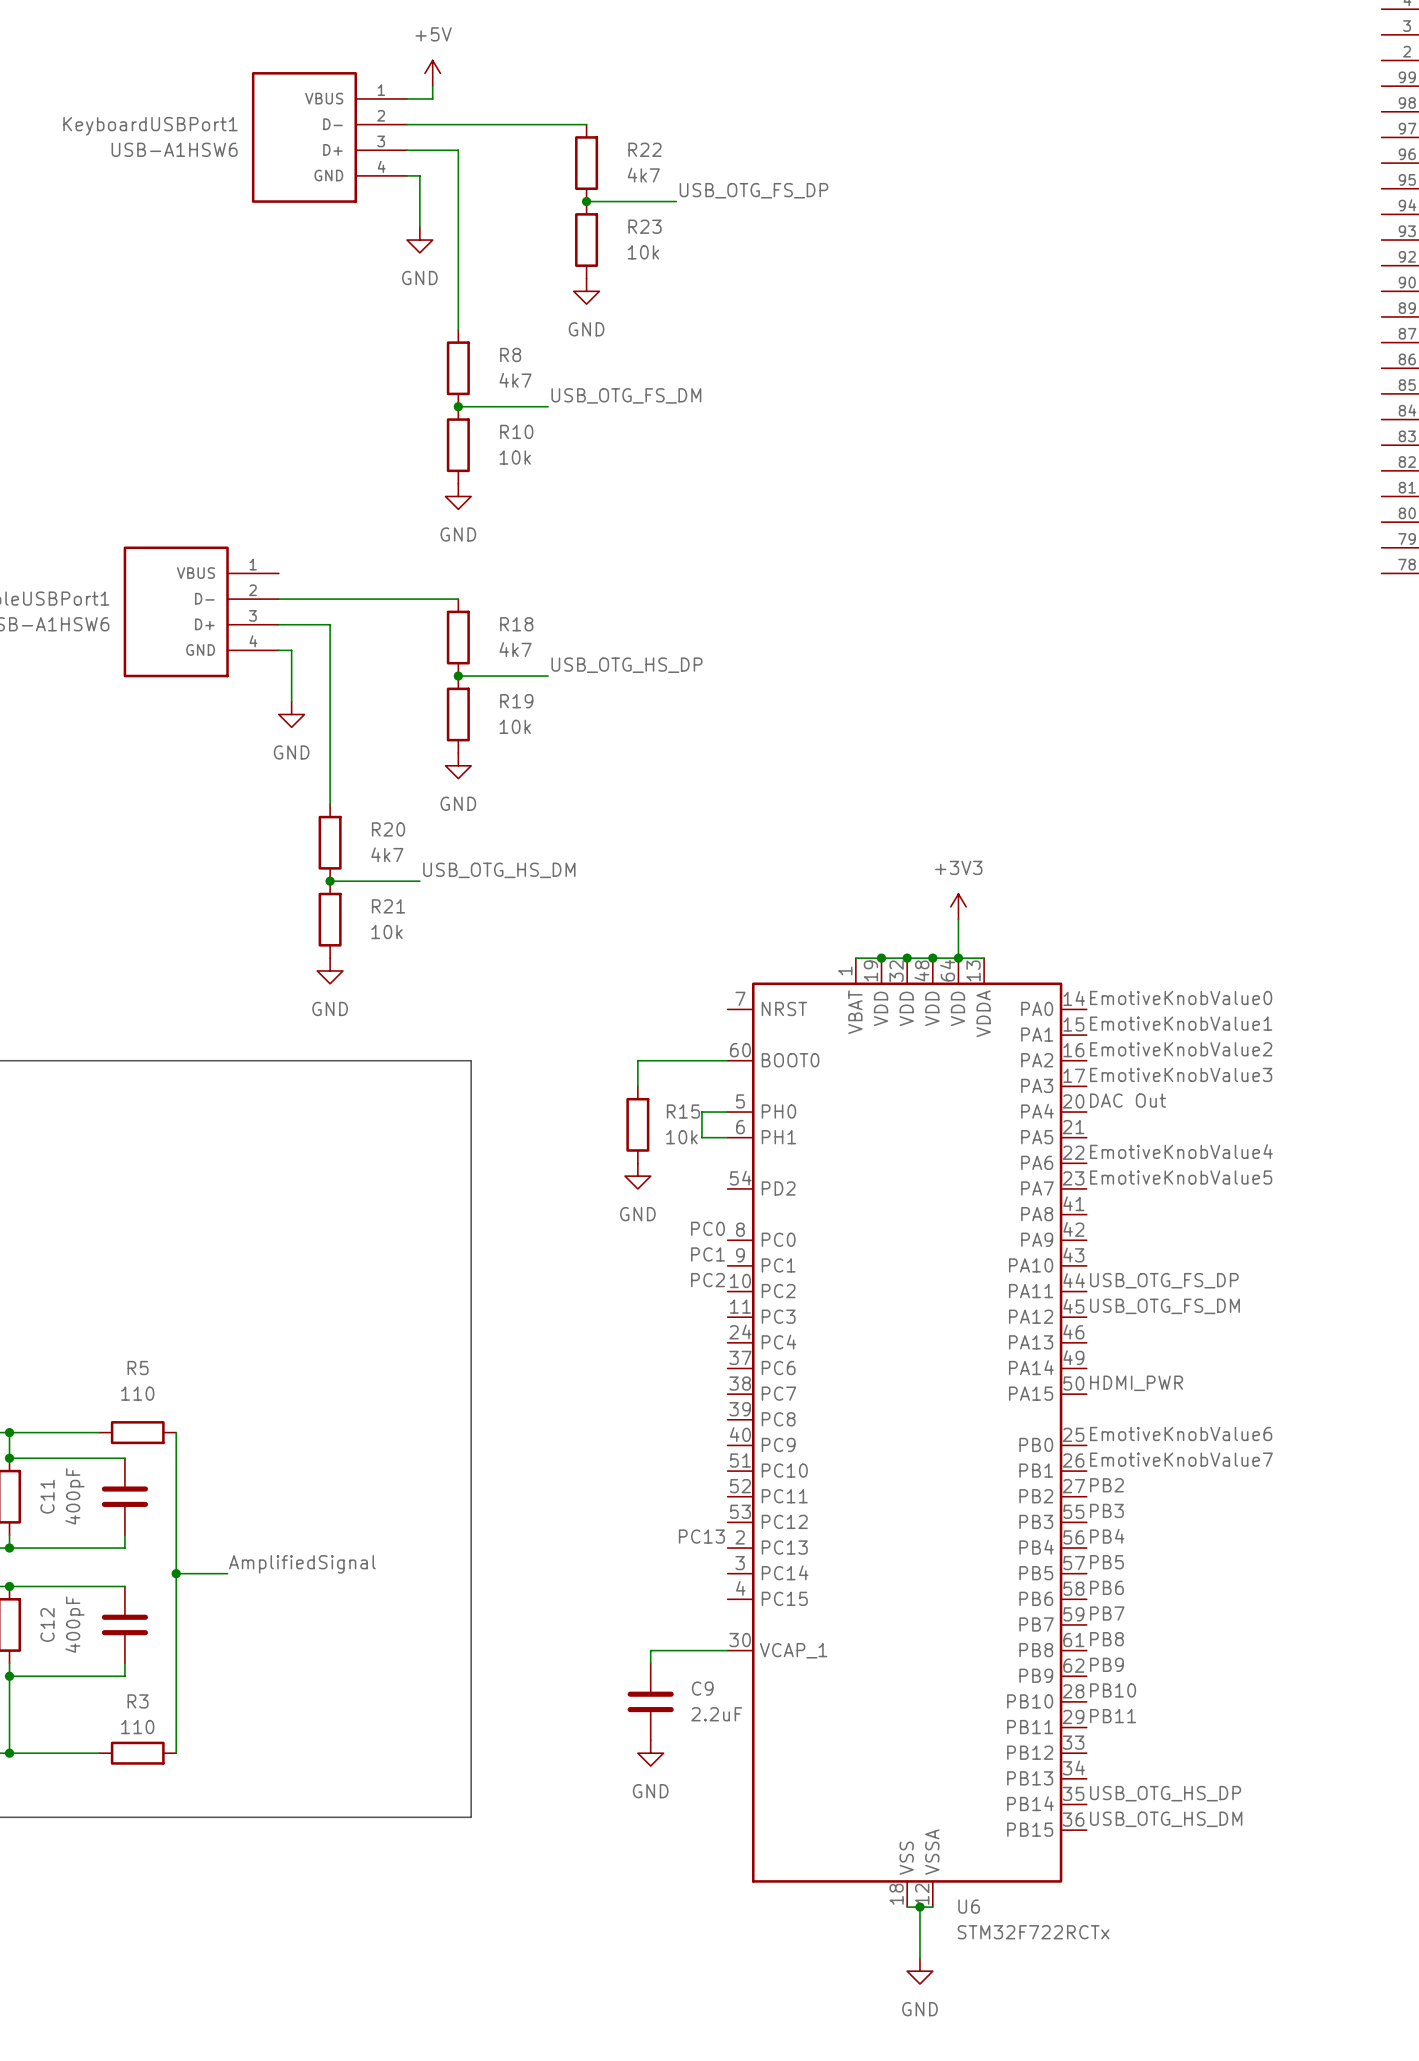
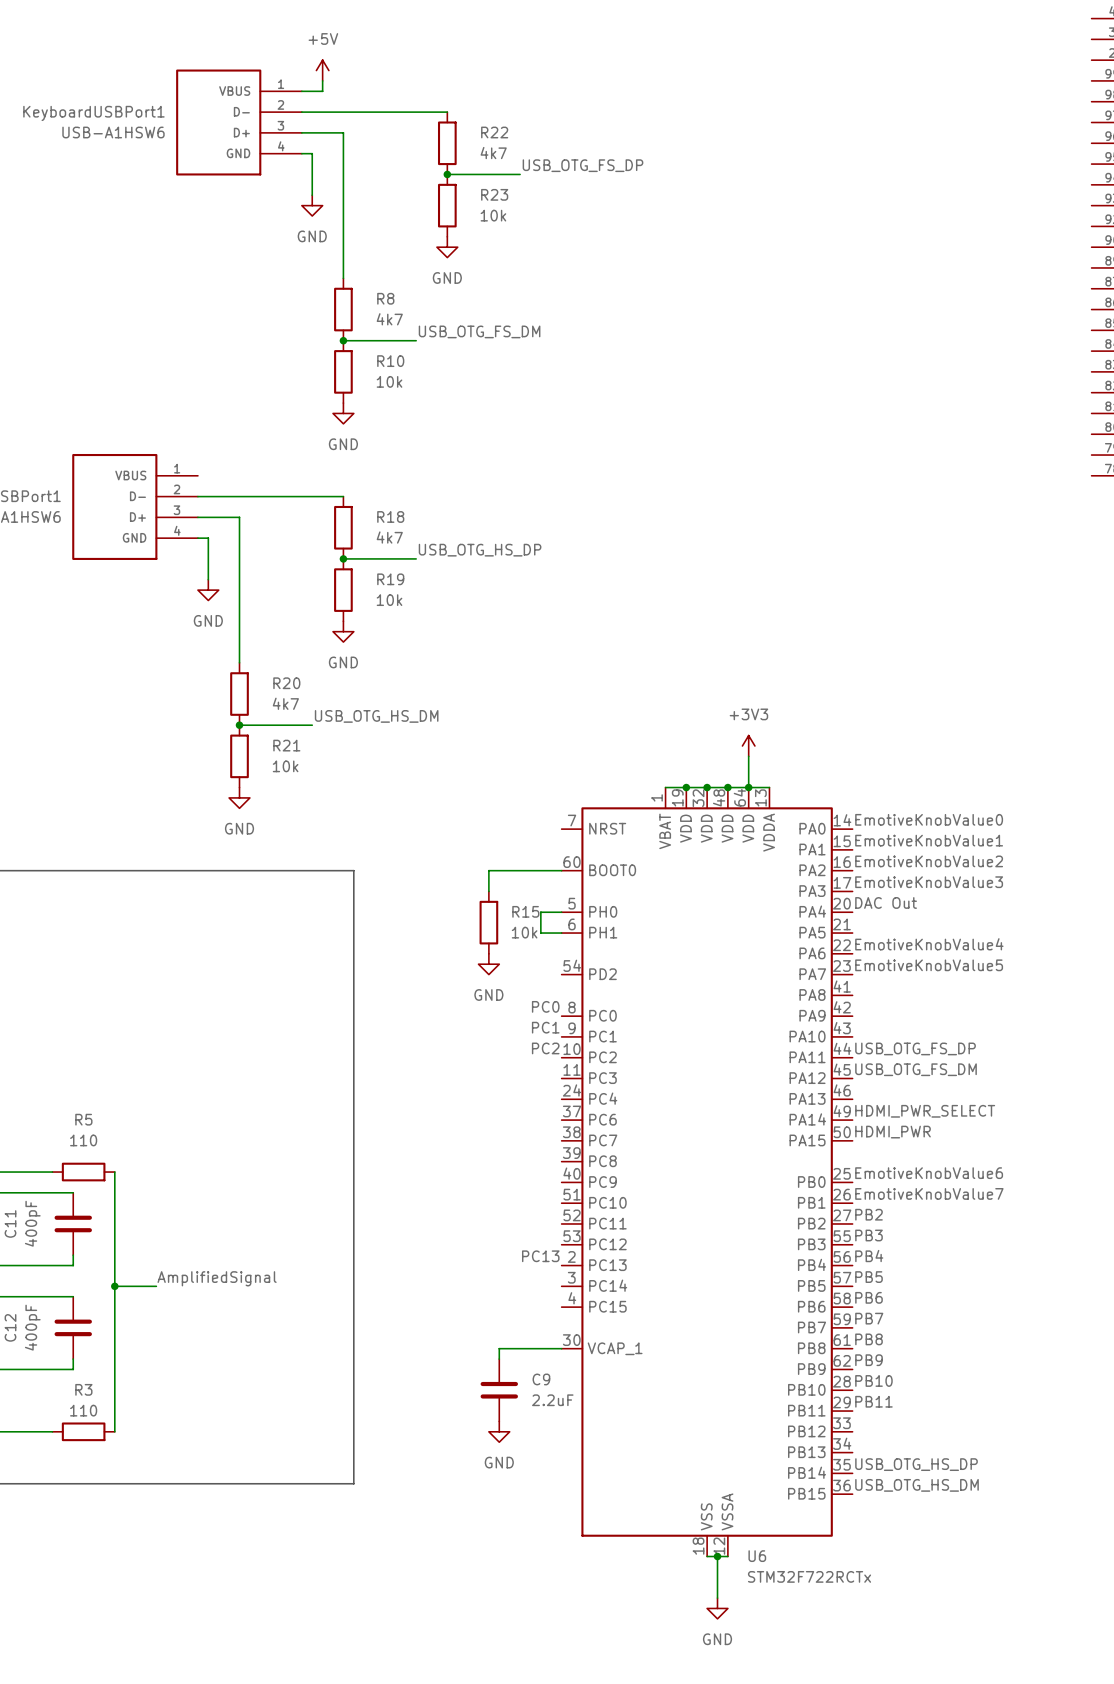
label: none -> HDMI_PWR_SELECT (925, 1111)

